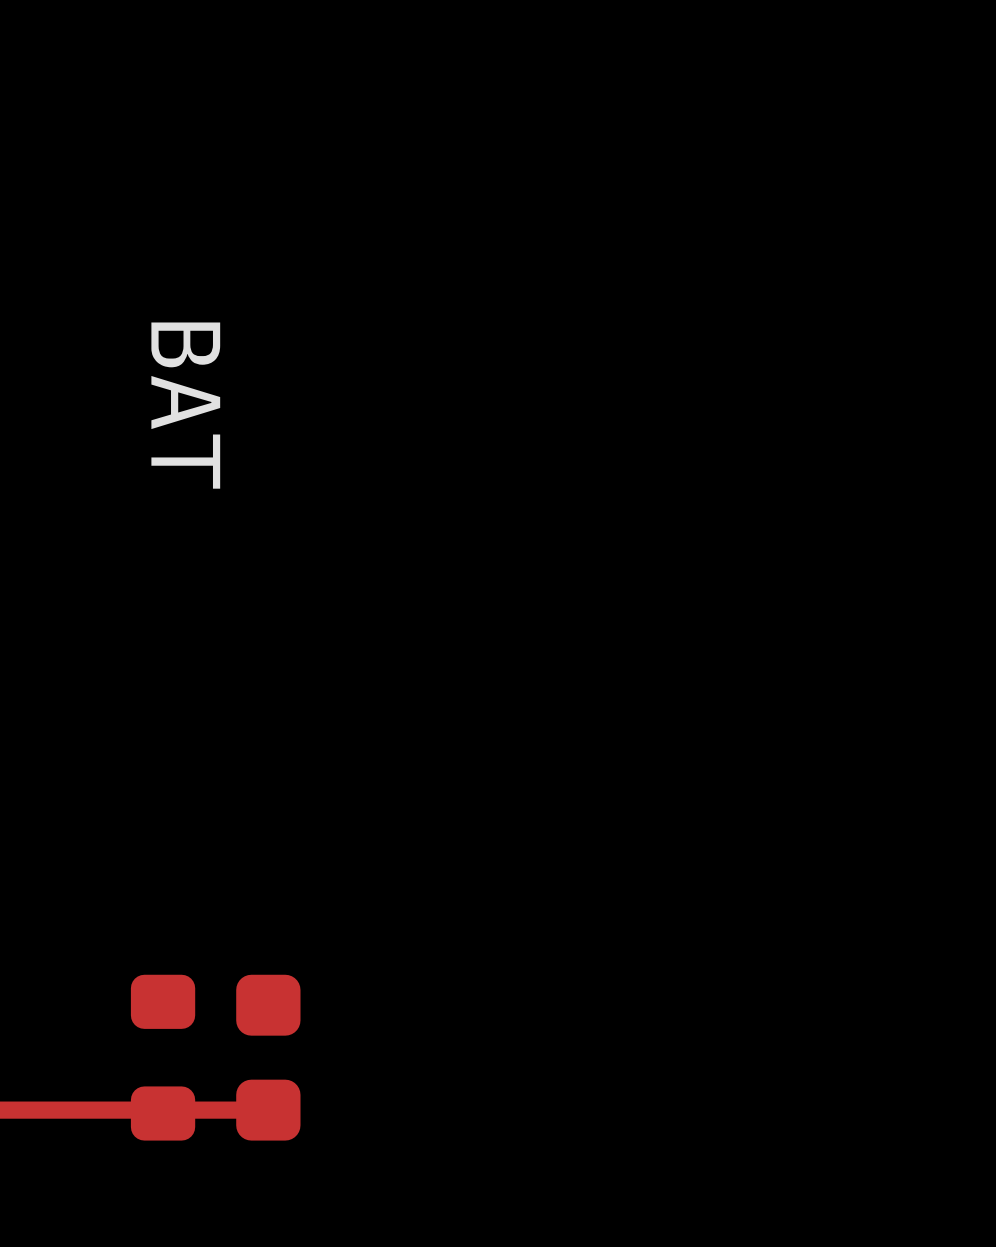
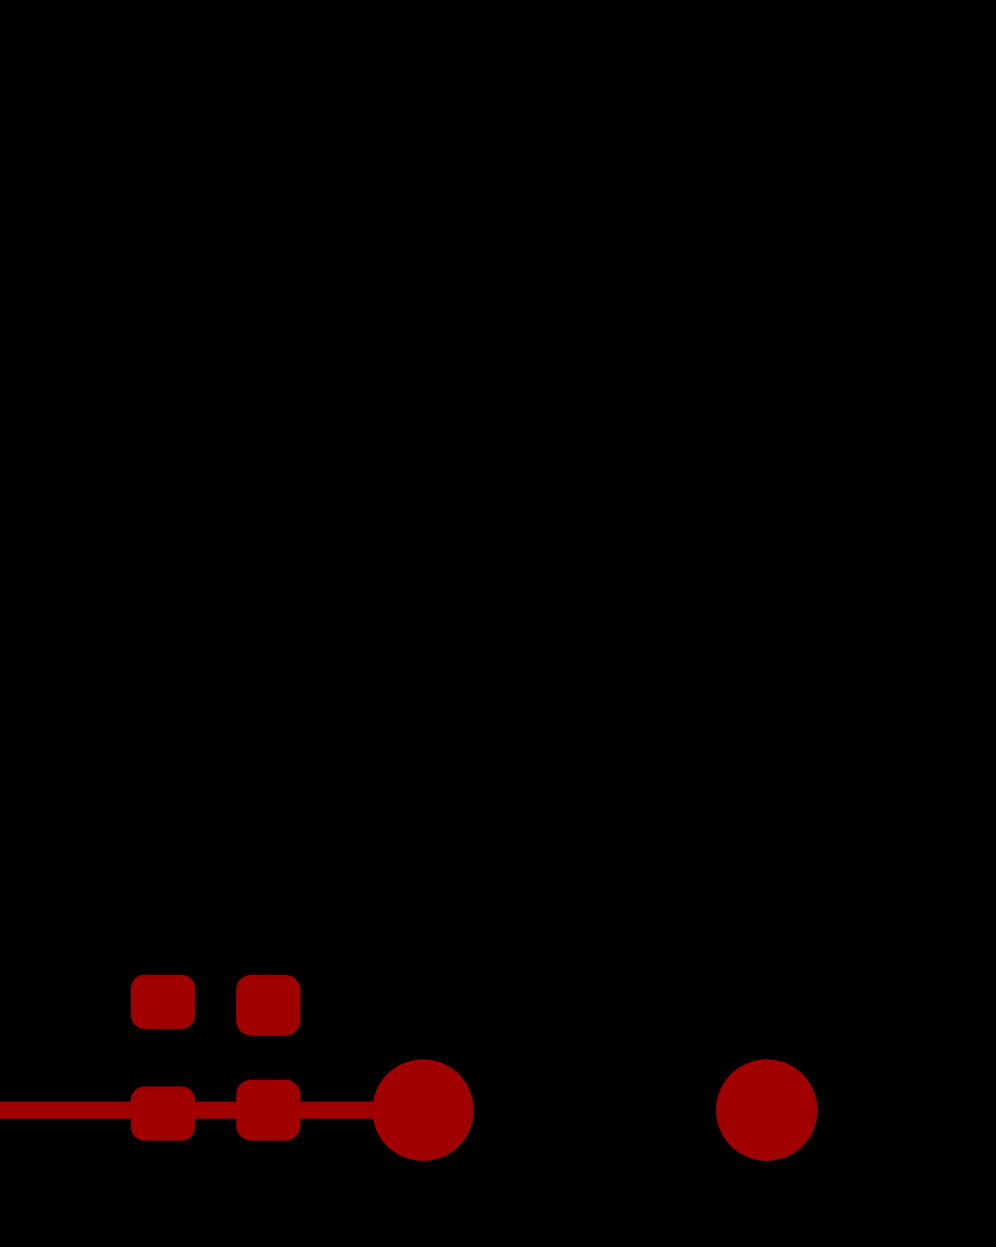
text: BAT (185, 405) -> none
top track: none -> (423, 1110) (268, 1110)
part: none -> (423, 1110)
part: none -> (766, 1110)

